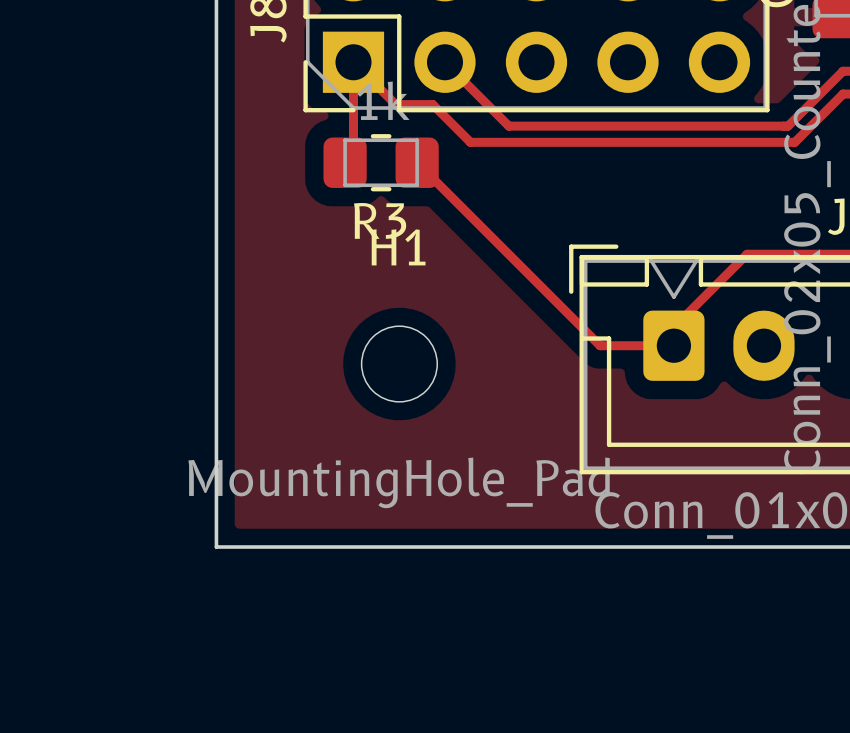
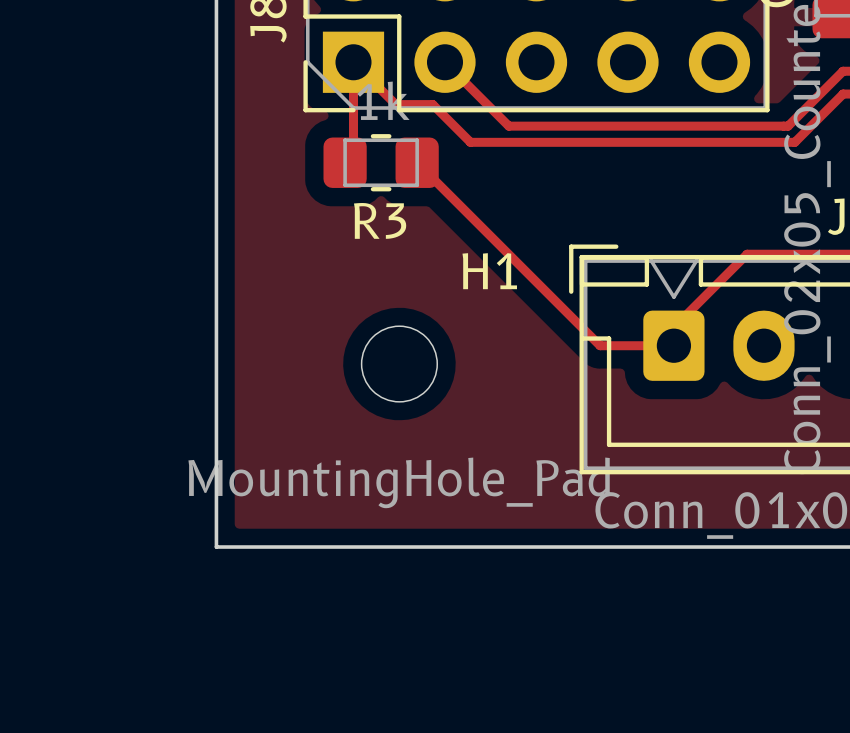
H1 name position: H1 (398, 247) -> H1 (489, 271)

